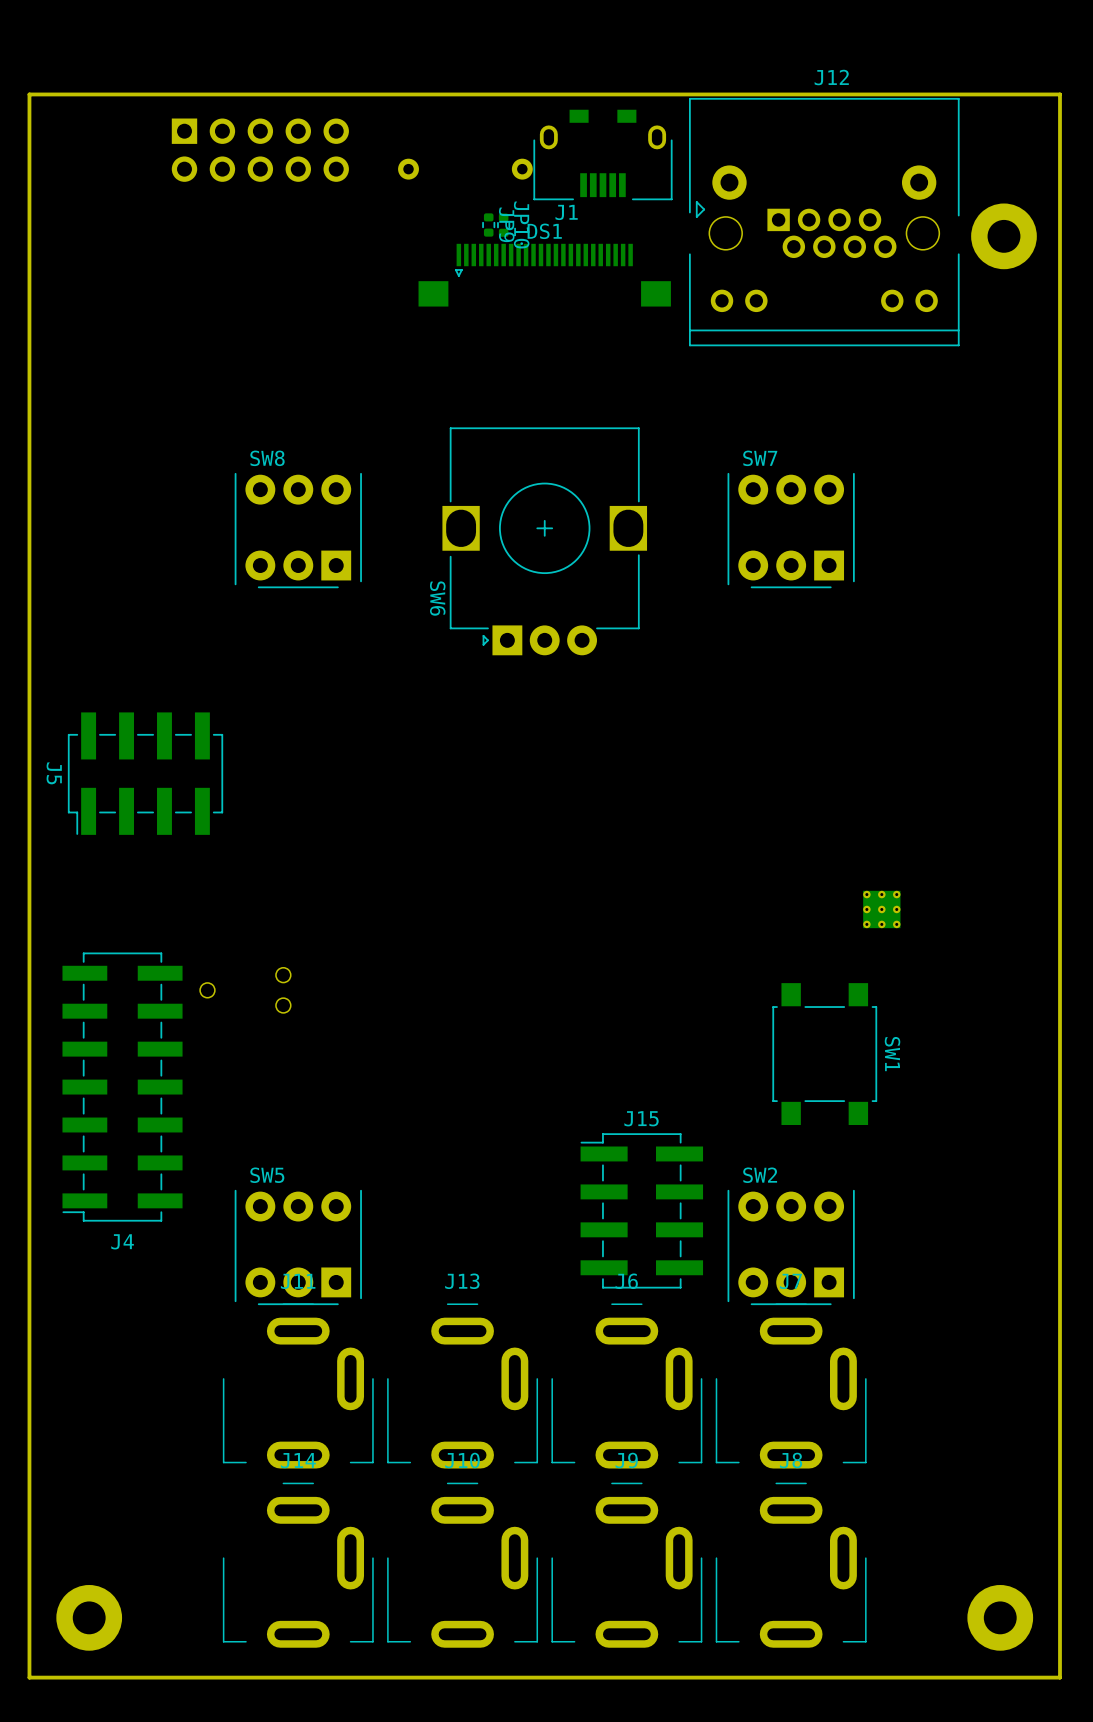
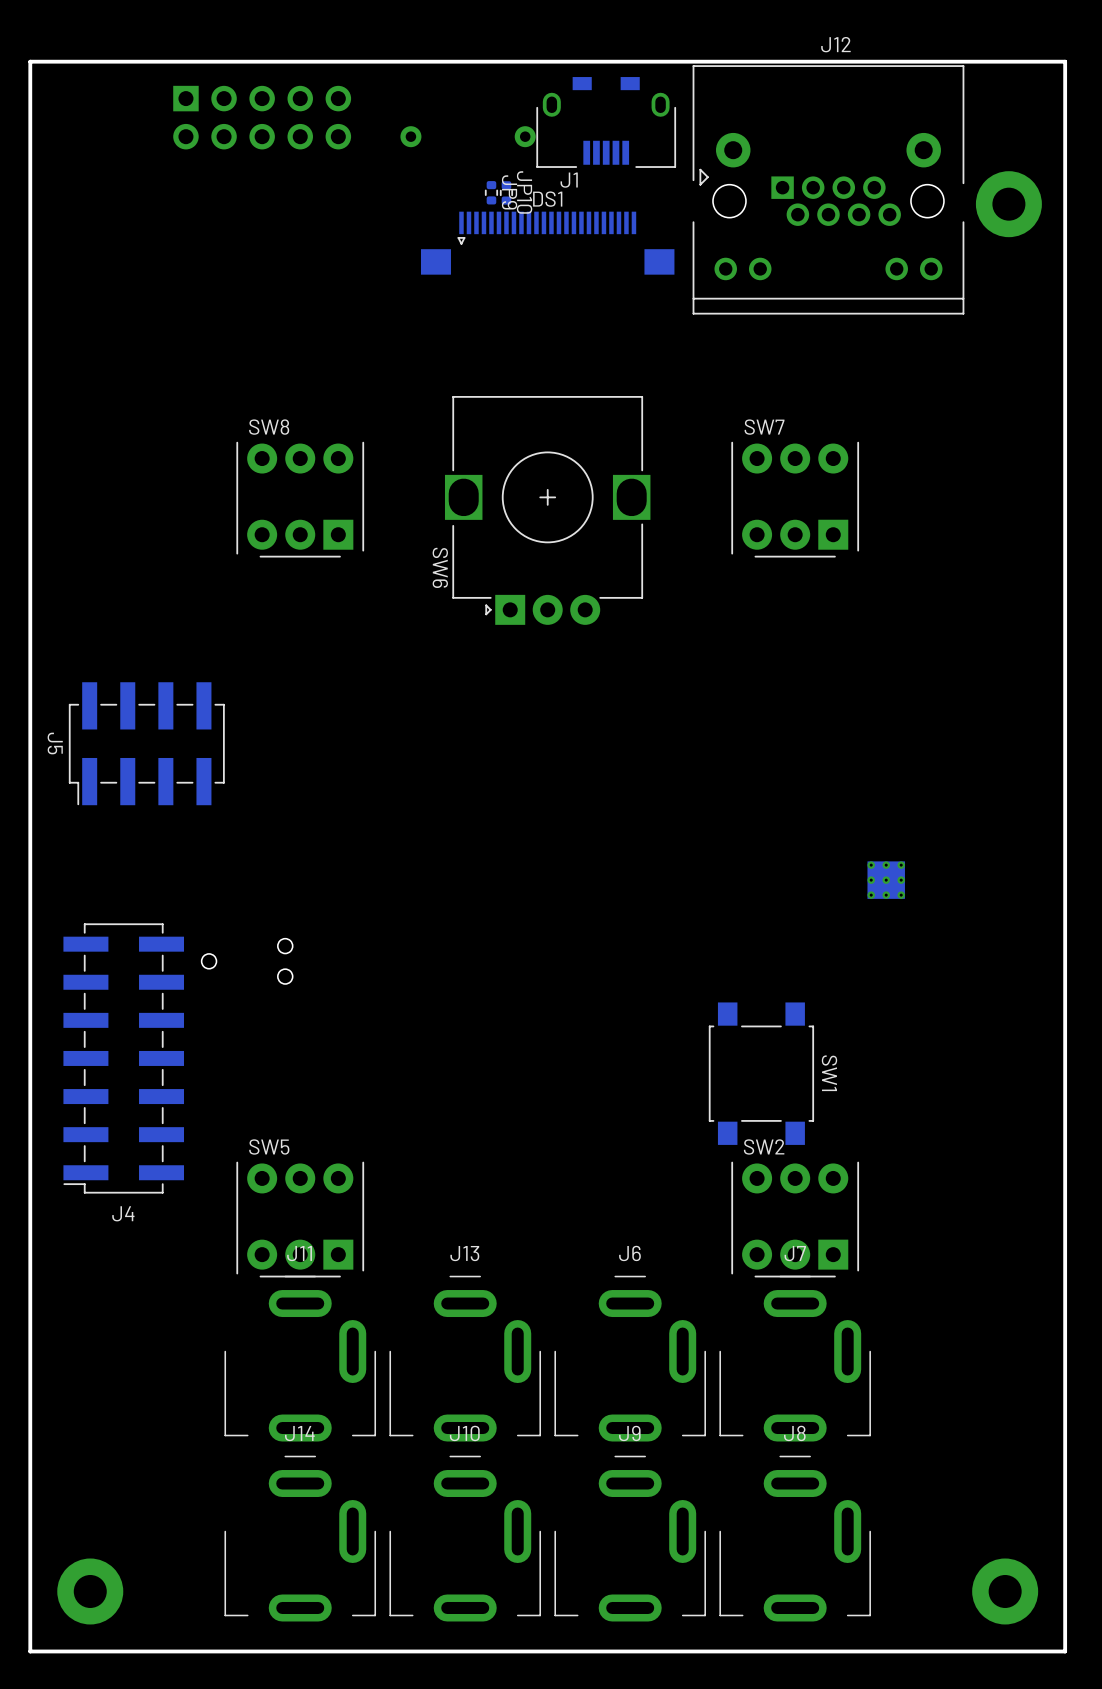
SW1 position: (824, 1054) -> (761, 1073)
J15: (641, 1210) -> none

